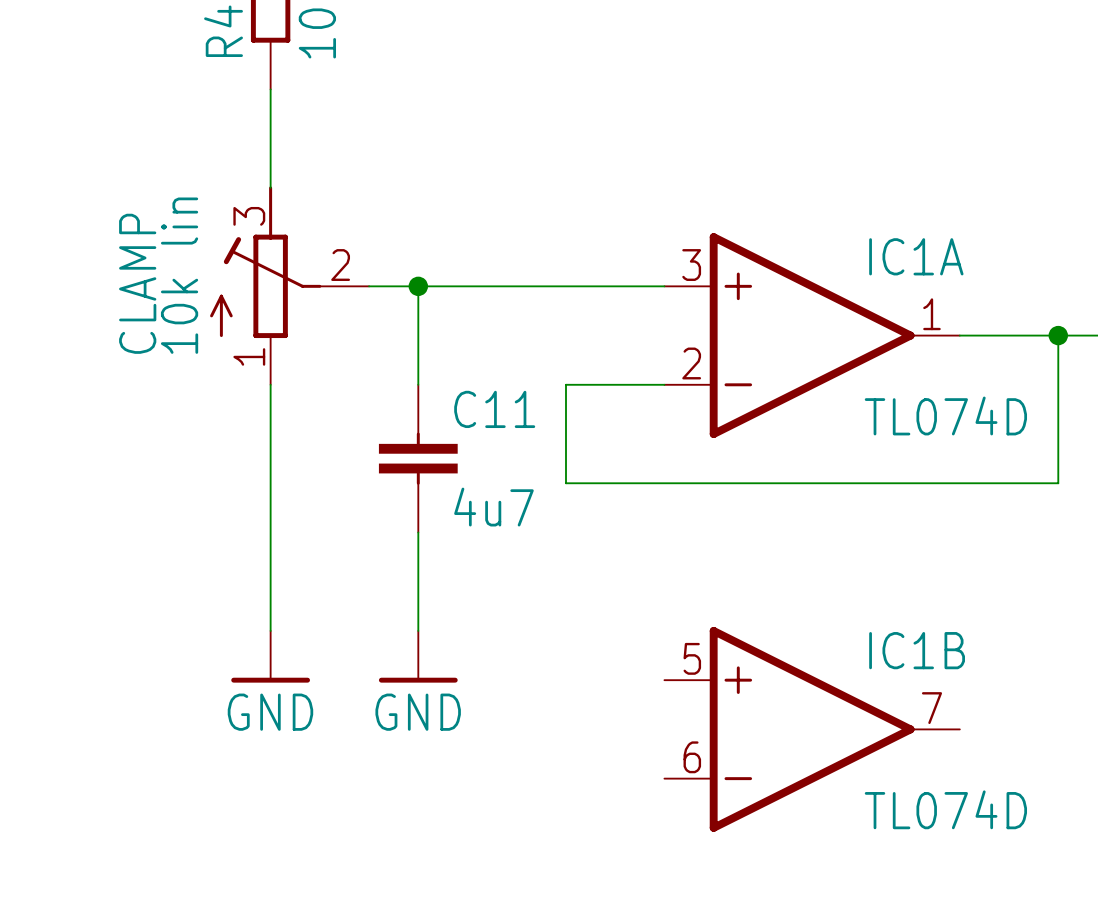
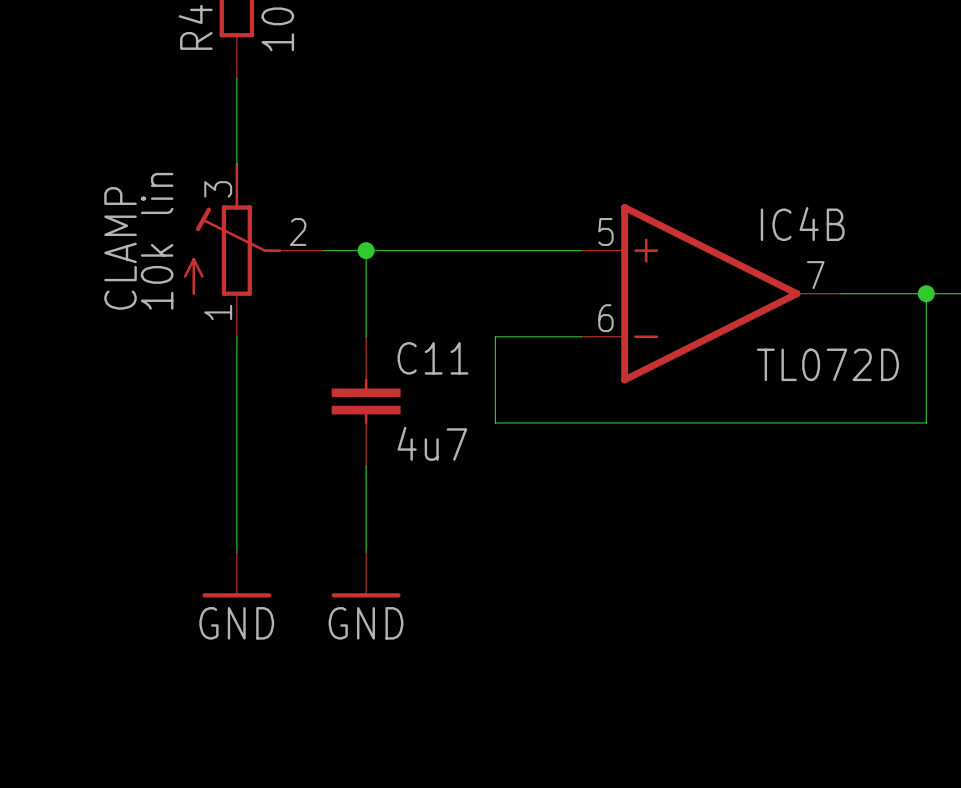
IC1A name: IC1A (916, 256) -> IC4B (802, 224)
IC1A pin number: 3 (691, 265) -> 5 (605, 231)
IC1A pin number: 1 (931, 314) -> 7 (815, 275)
IC1A pin number: 2 (691, 363) -> 6 (605, 318)
IC1A value: TL074D (945, 415) -> TL072D (827, 364)
IC1B: TL074D (812, 729) -> none

